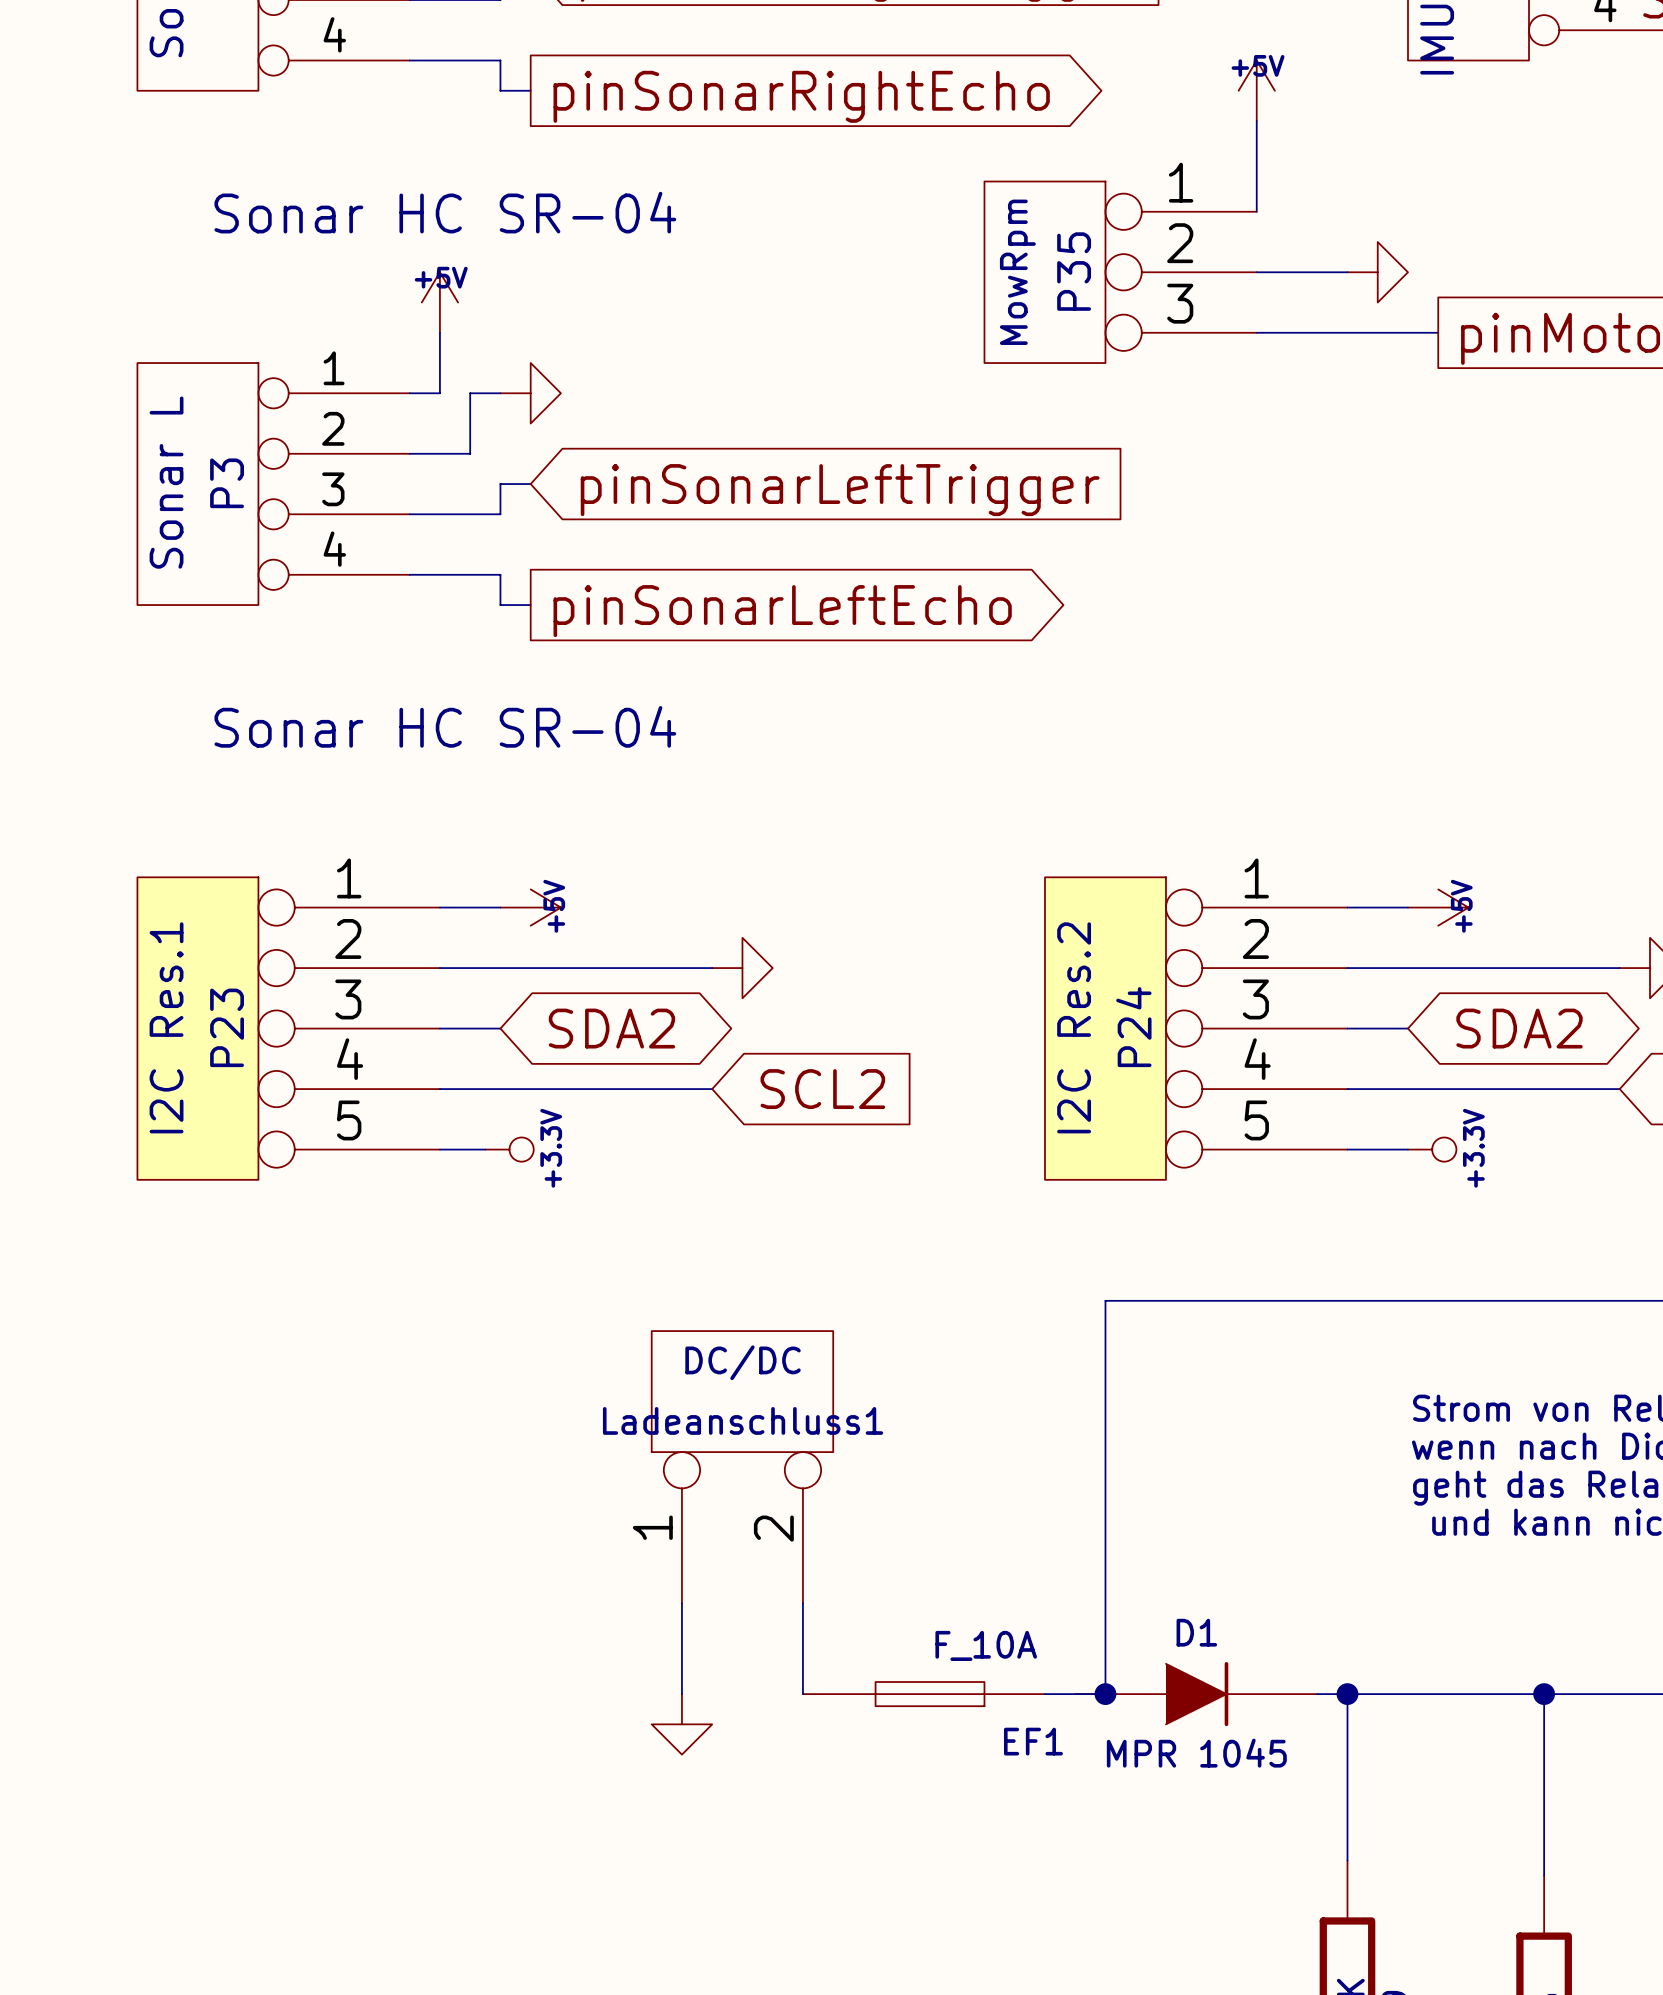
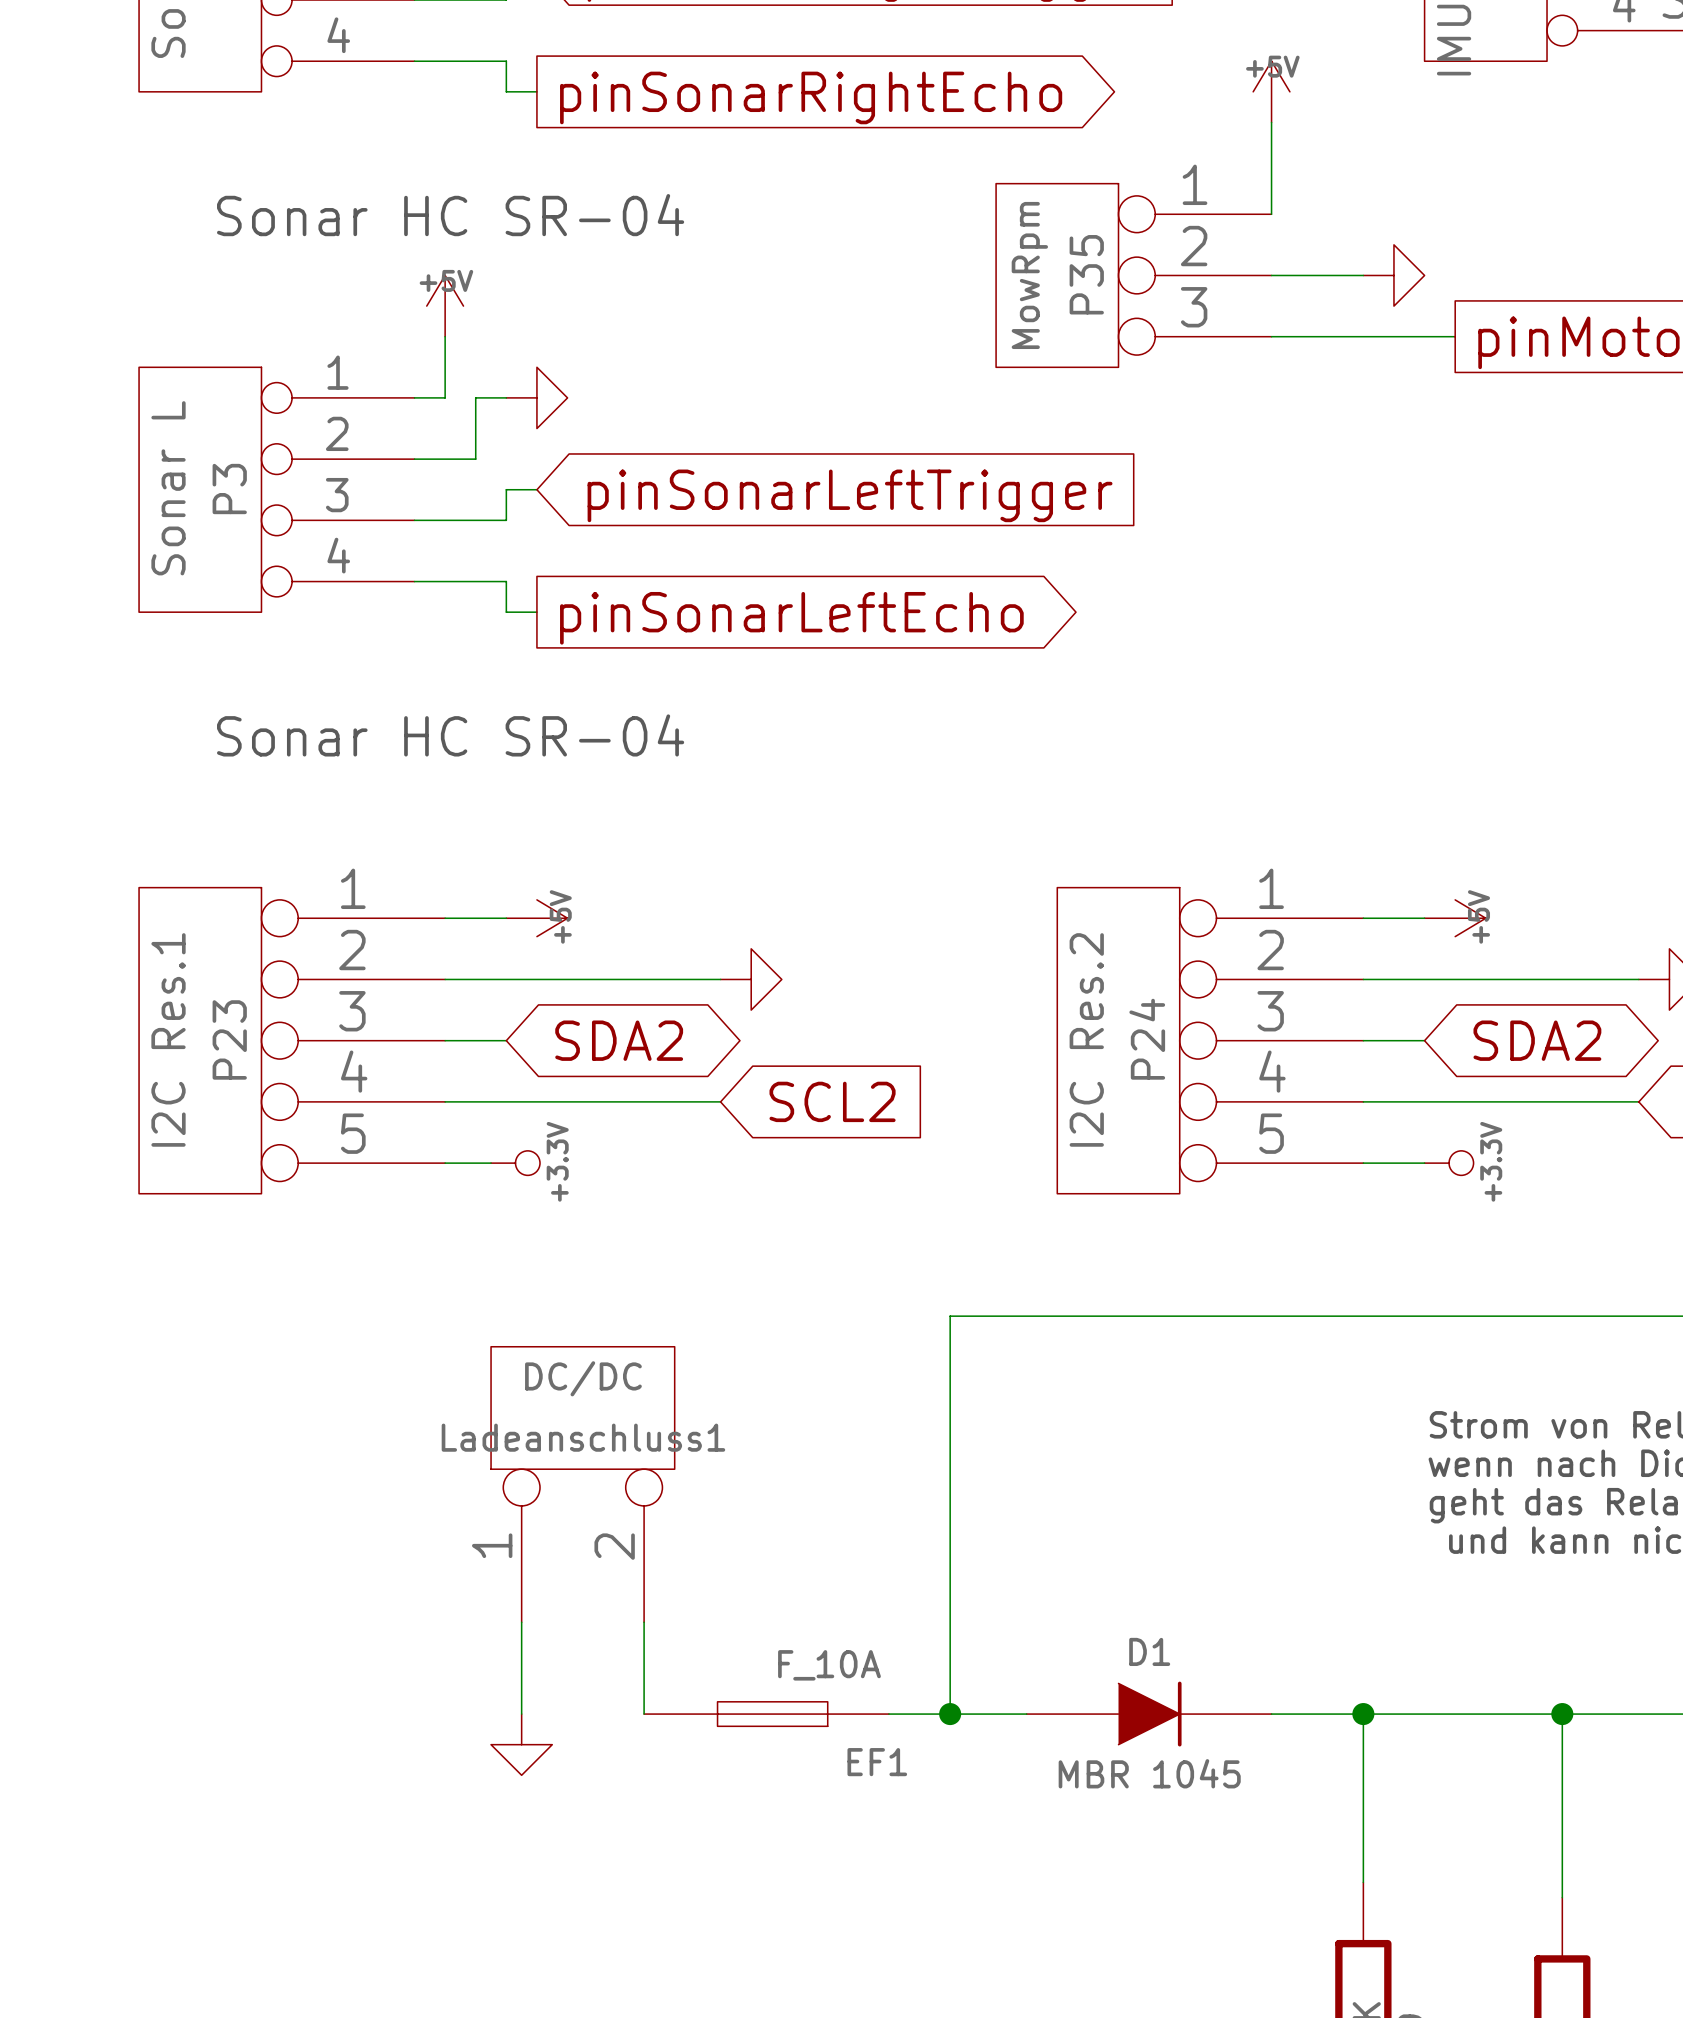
wire: (1105, 1300) (1105, 1694) (1044, 1694) -> (1118, 1316) (950, 1316) (950, 1714)
Ladeanschluss1 position: (742, 1467) -> (582, 1484)
wire: (681, 1603) (681, 1694) -> (644, 1622) (644, 1714)
wire: (802, 1603) (802, 1694) -> (521, 1622) (521, 1714)
EF1 position: (923, 1639) -> (766, 1658)
junction: none -> (950, 1714)
junction: (1105, 1694) -> none
D1 position: (1196, 1694) -> (1149, 1714)
power symbol position: (681, 1724) -> (521, 1744)
D1 value: MPR 1045 (1196, 1753) -> MBR 1045 (1149, 1773)

